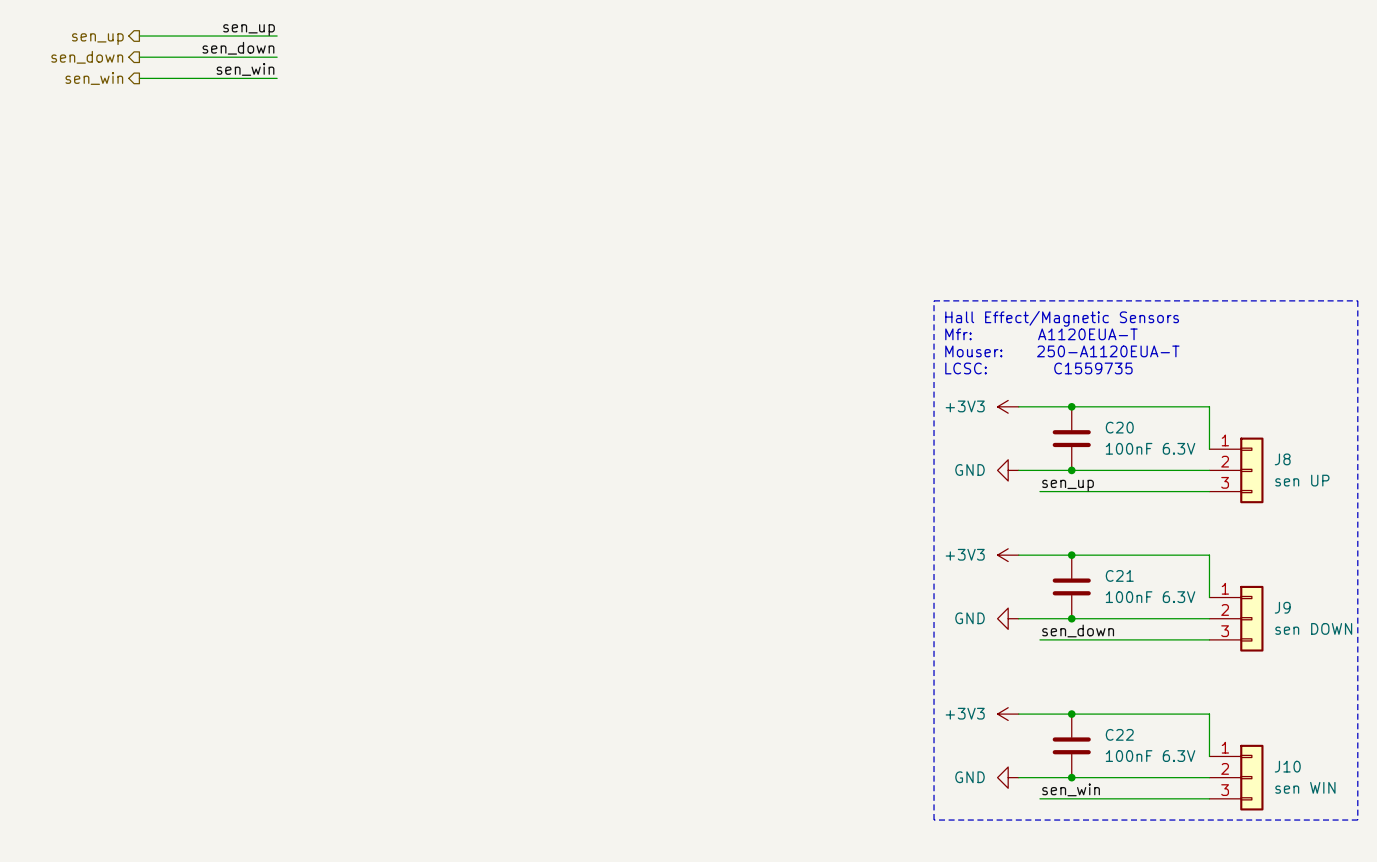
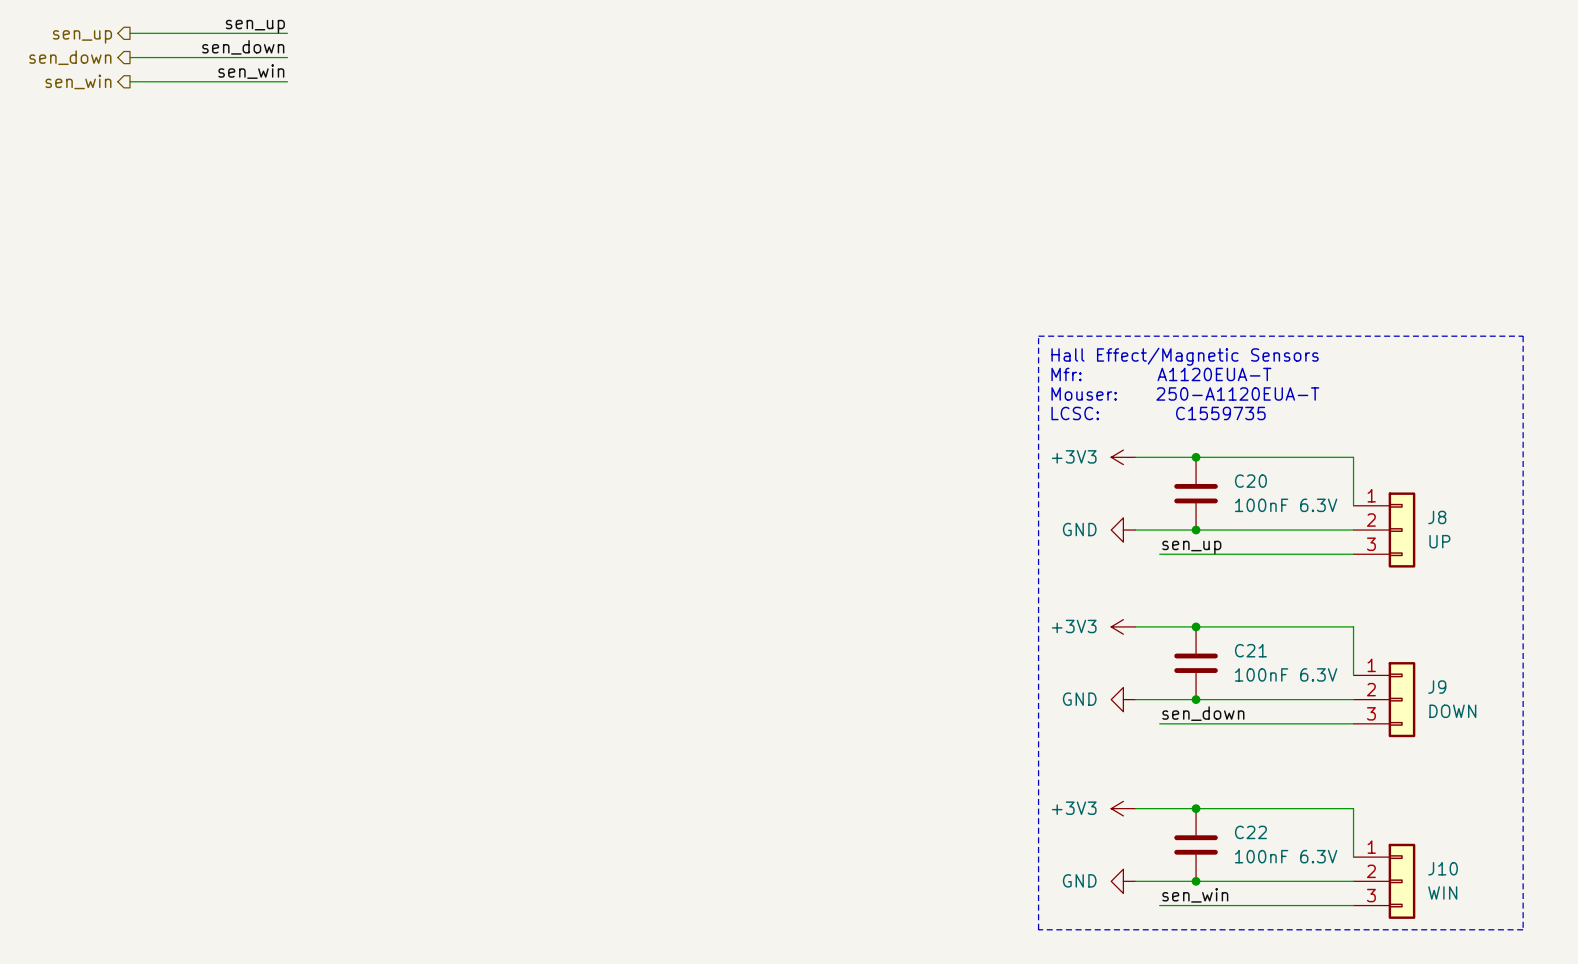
J8 value: sen UP (1302, 480) -> UP (1439, 541)
J9 value: sen DOWN (1313, 628) -> DOWN (1452, 711)
J10 value: sen WIN (1305, 787) -> WIN (1442, 892)

